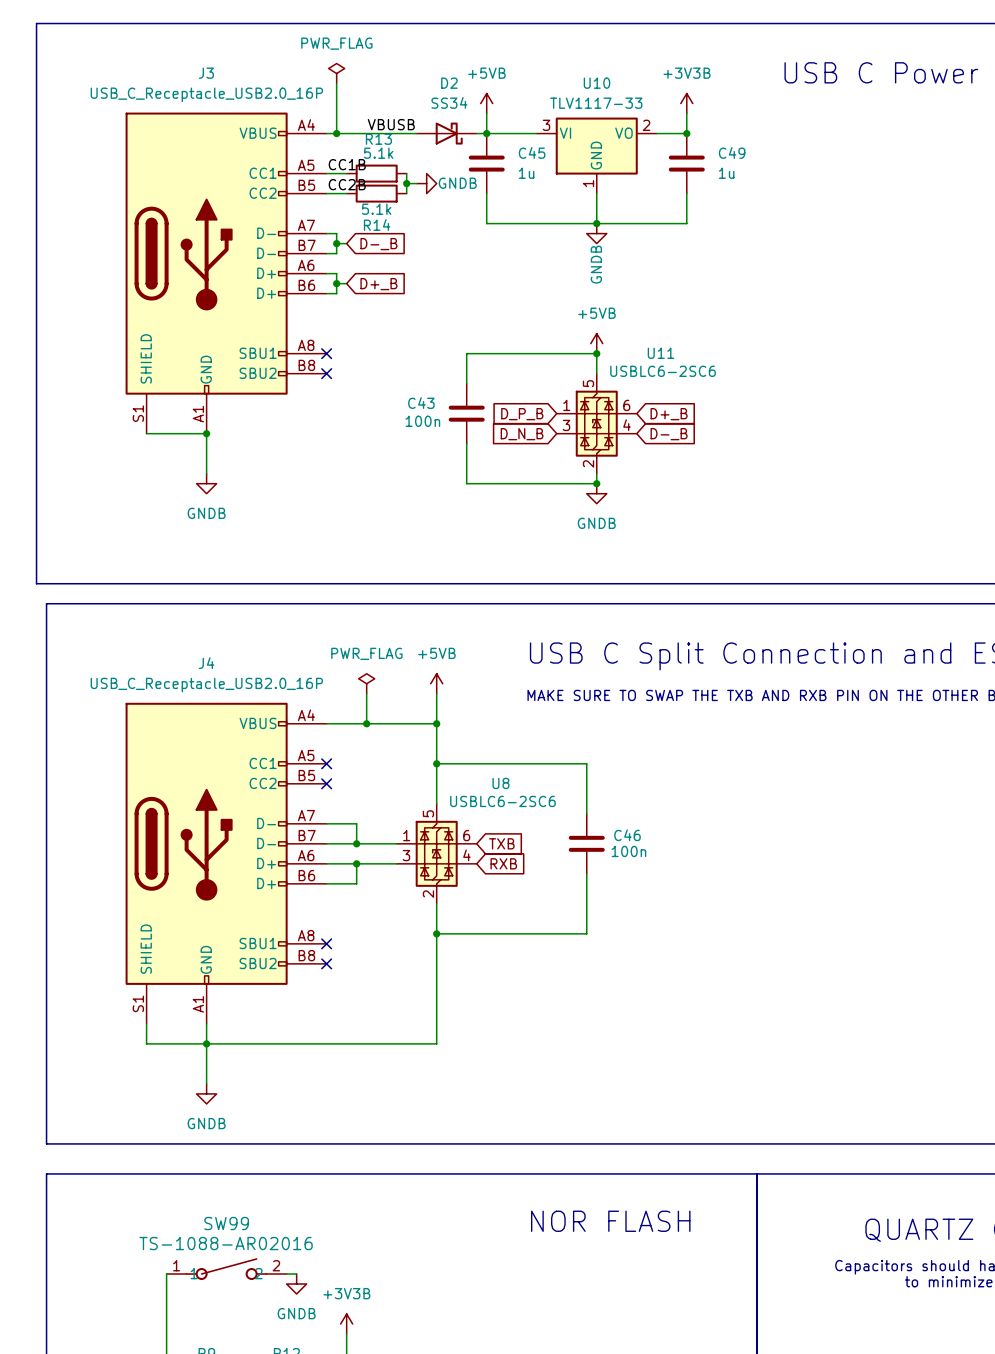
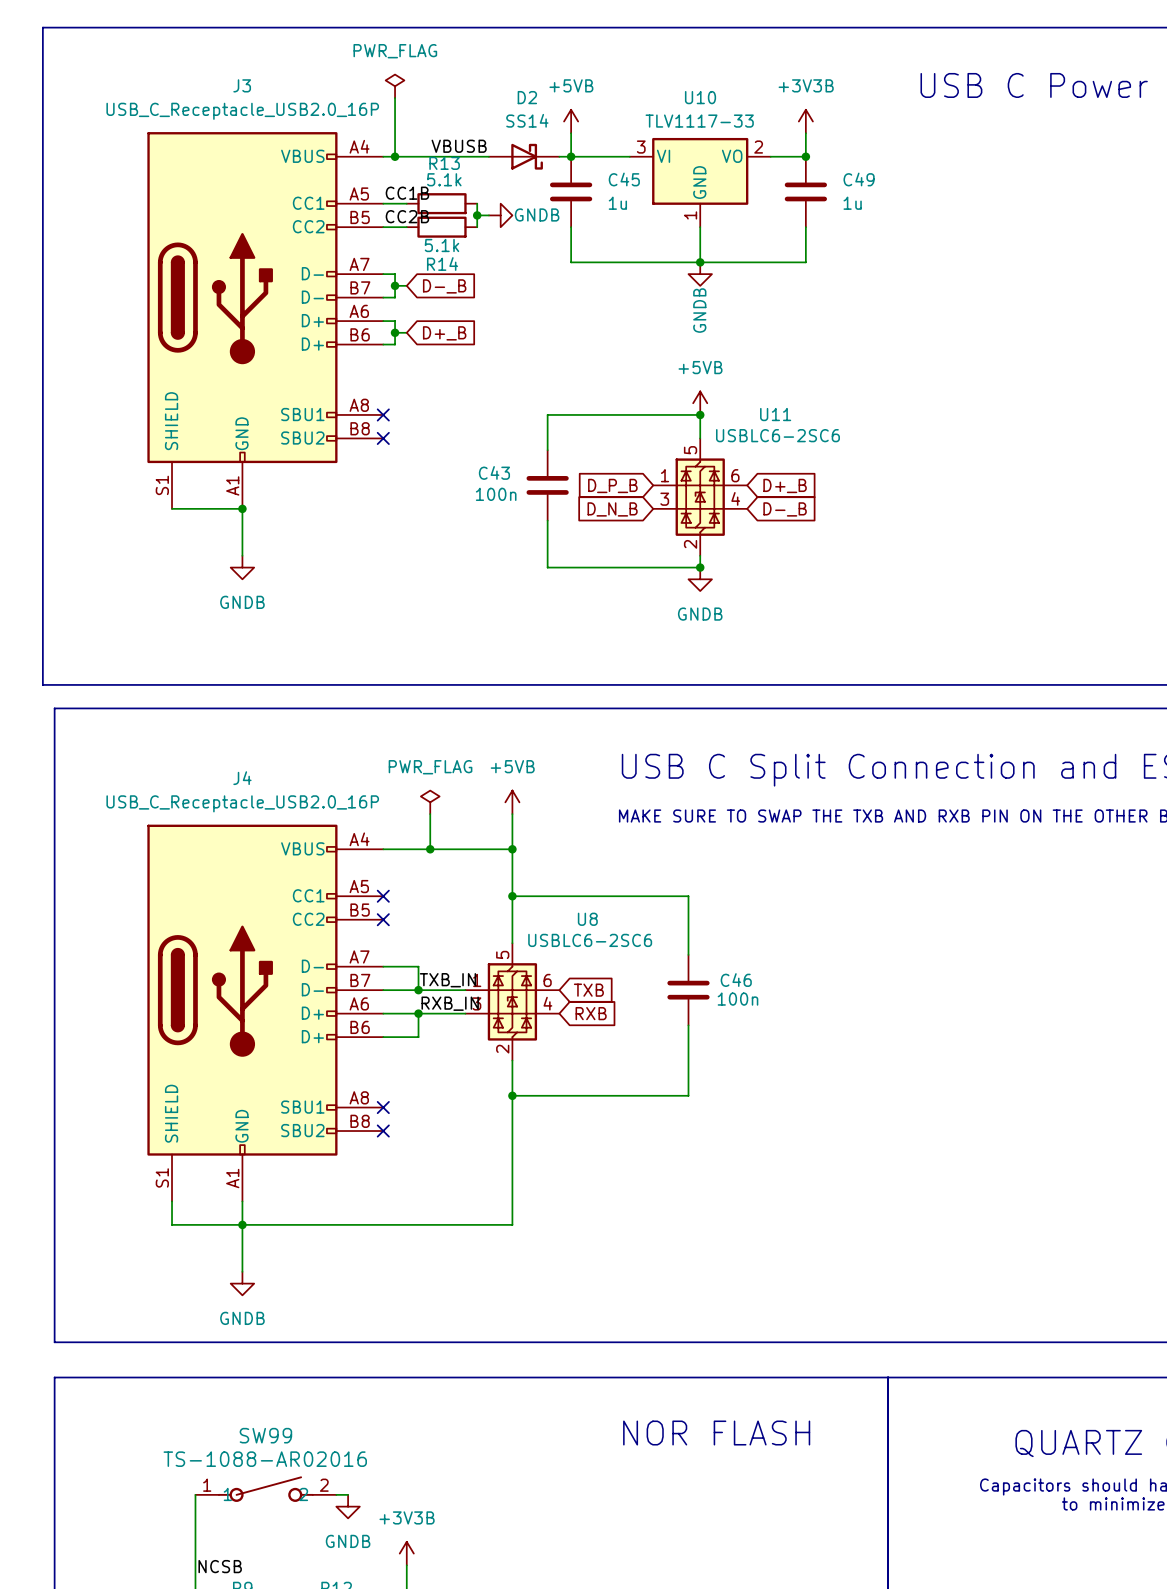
D2 value: SS34 (449, 102) -> SS14 (527, 120)
label: none -> TXB_IN (447, 980)
label: none -> RXB_IN (450, 1003)
label: none -> NCSB (220, 1566)

